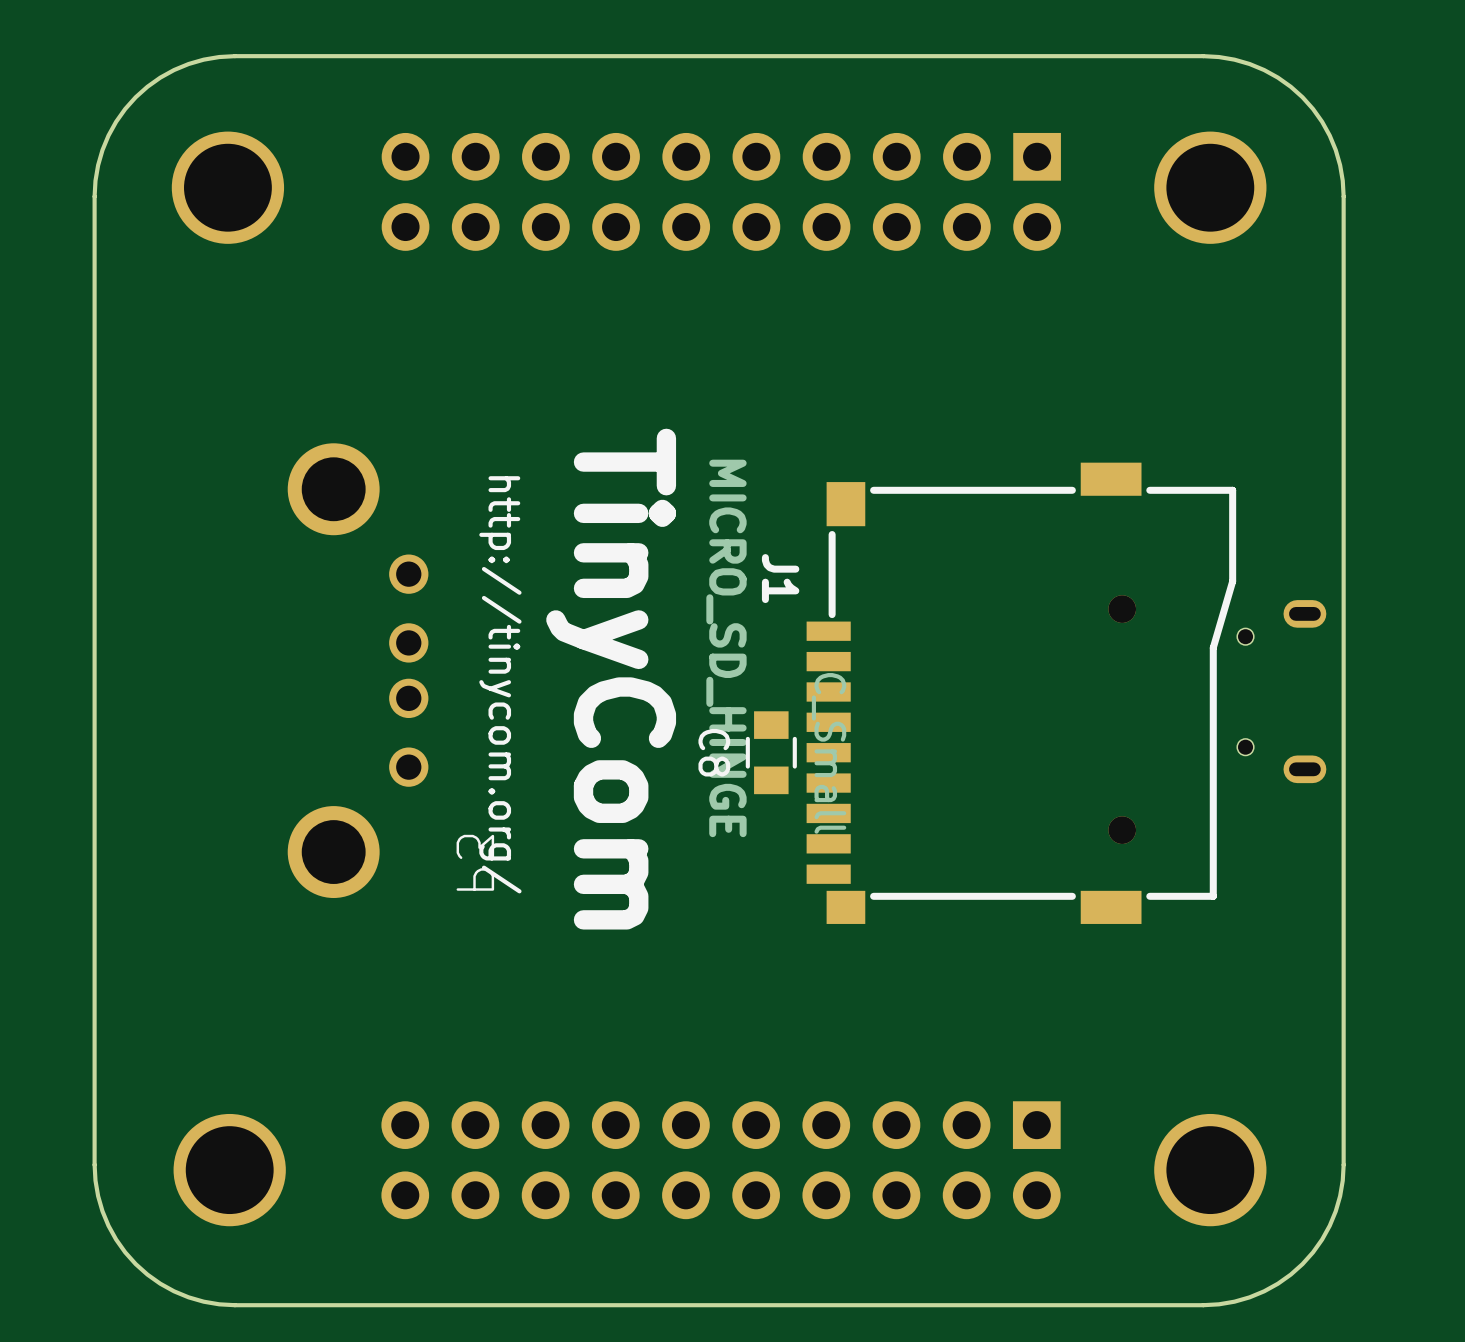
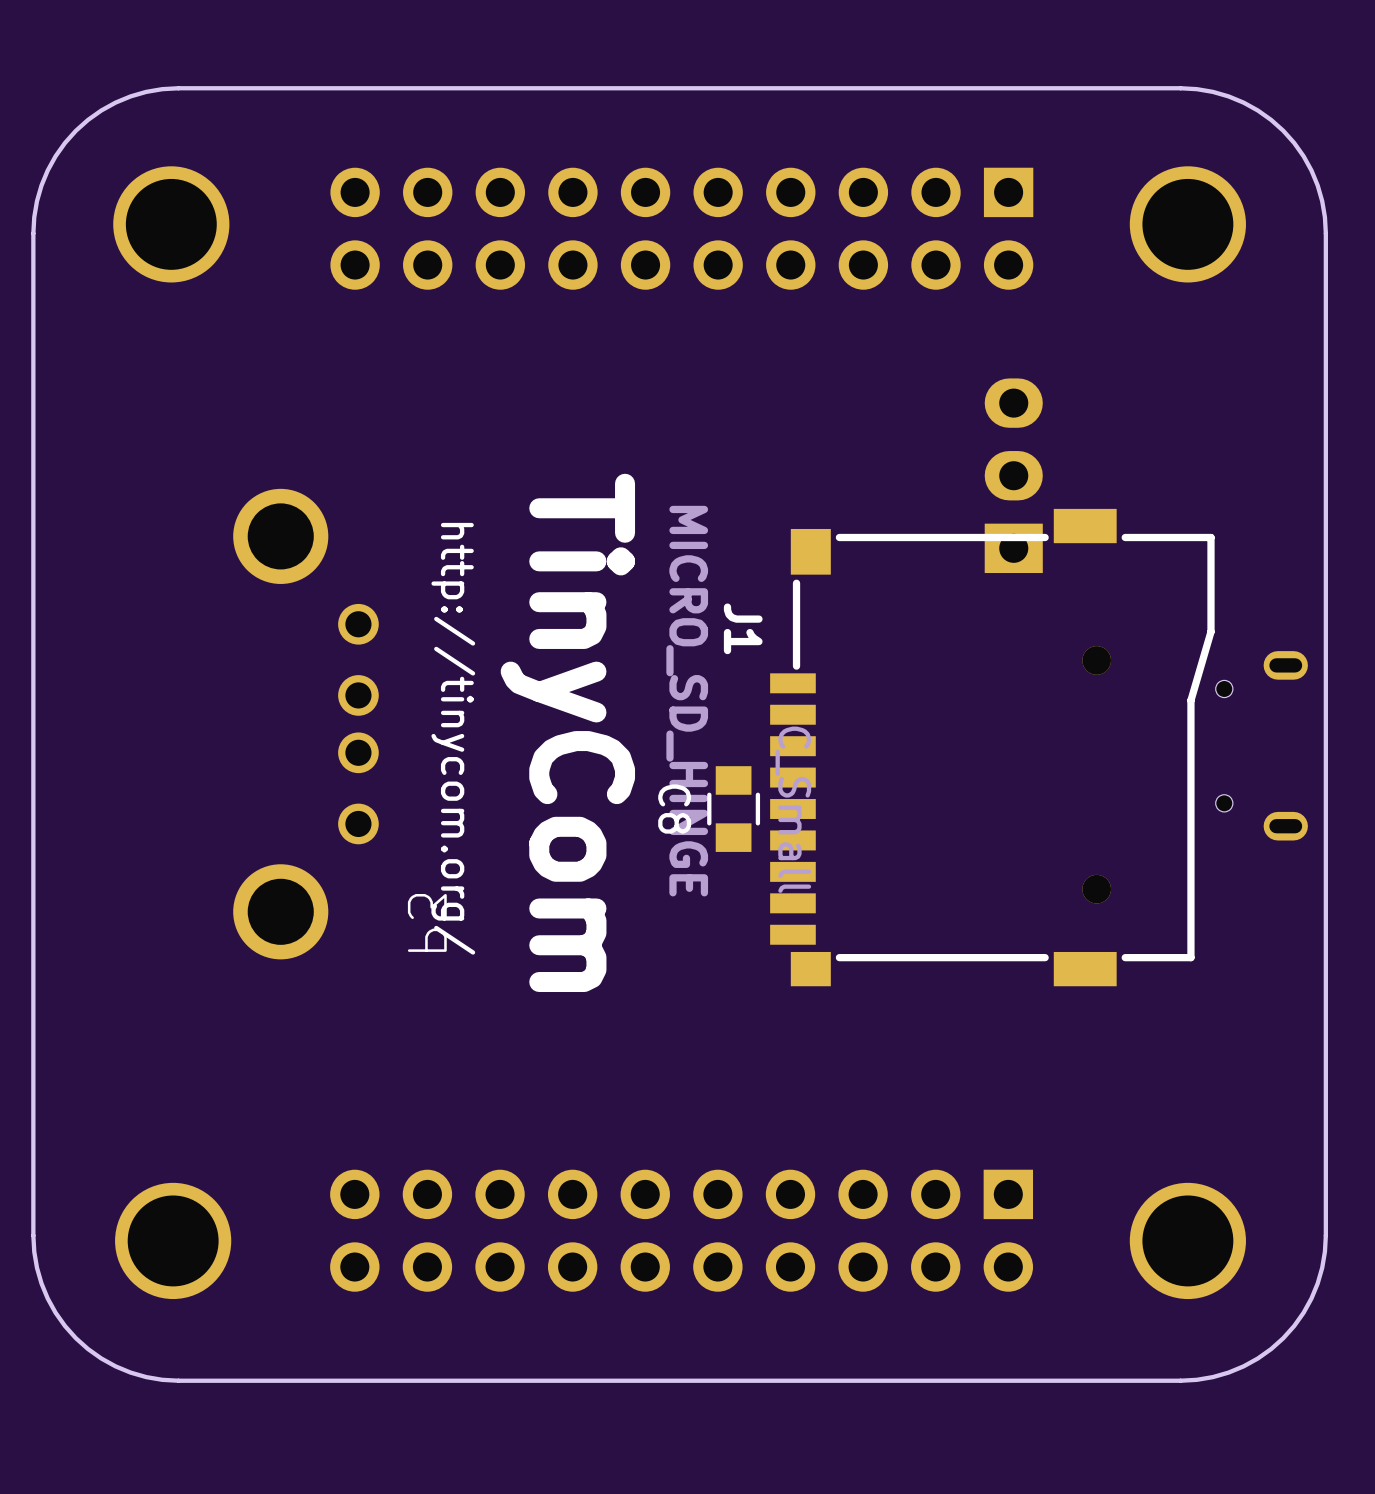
part: none -> (1013, 475)

